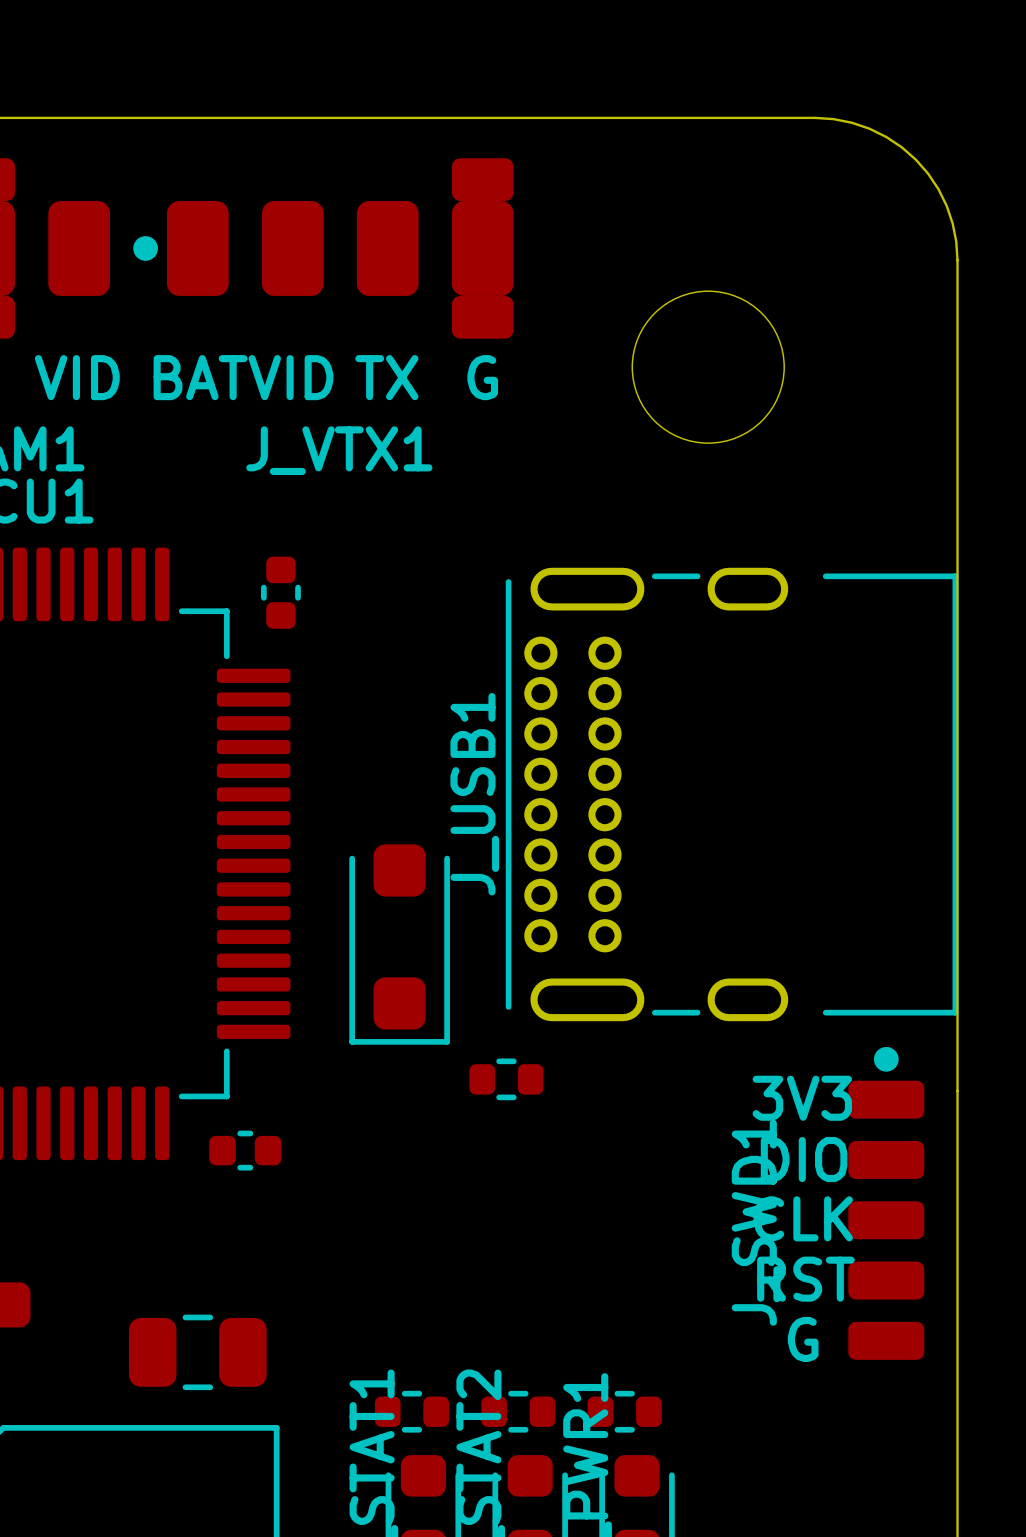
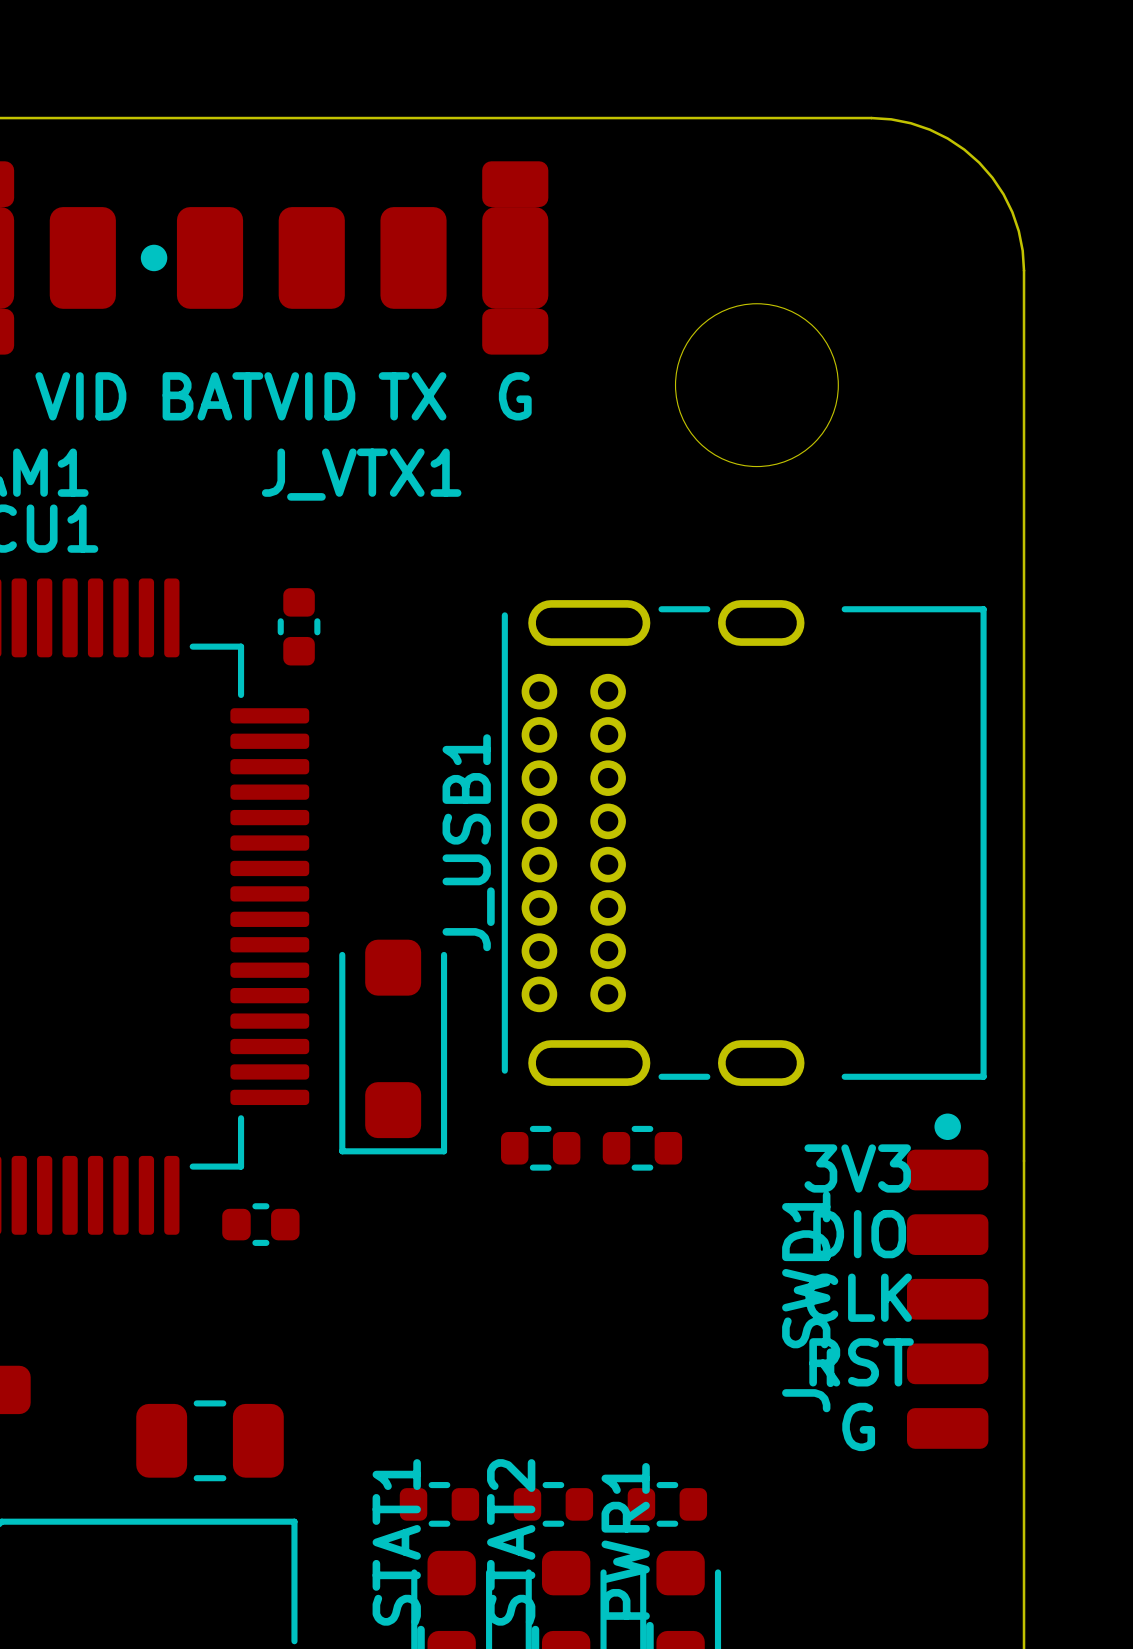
J_USB1 position: (731, 794) -> (744, 843)
part position: (399, 944) -> (393, 1047)
part: none -> (642, 1148)

